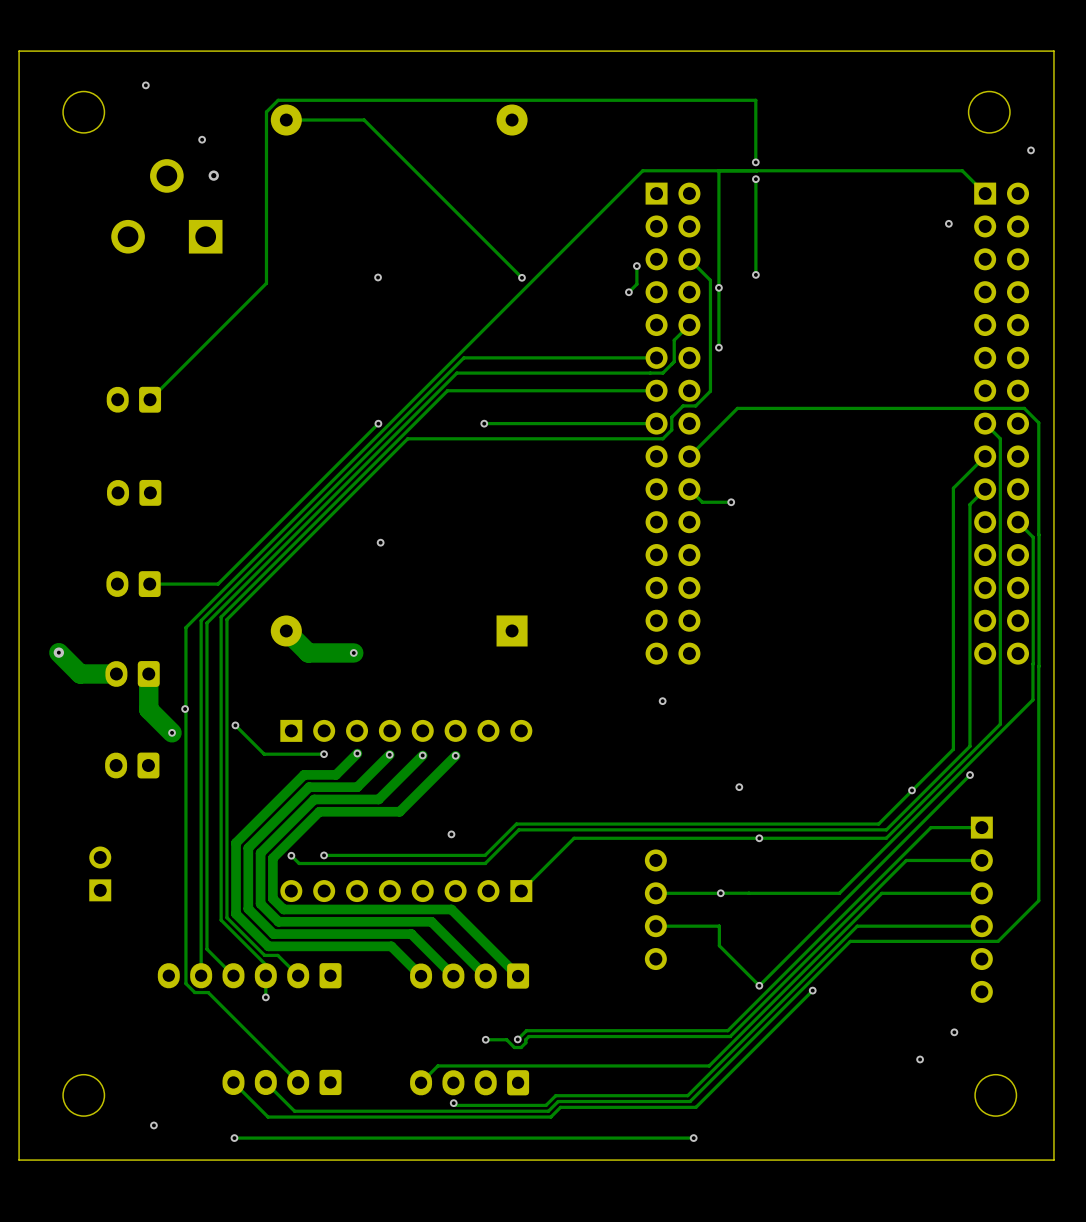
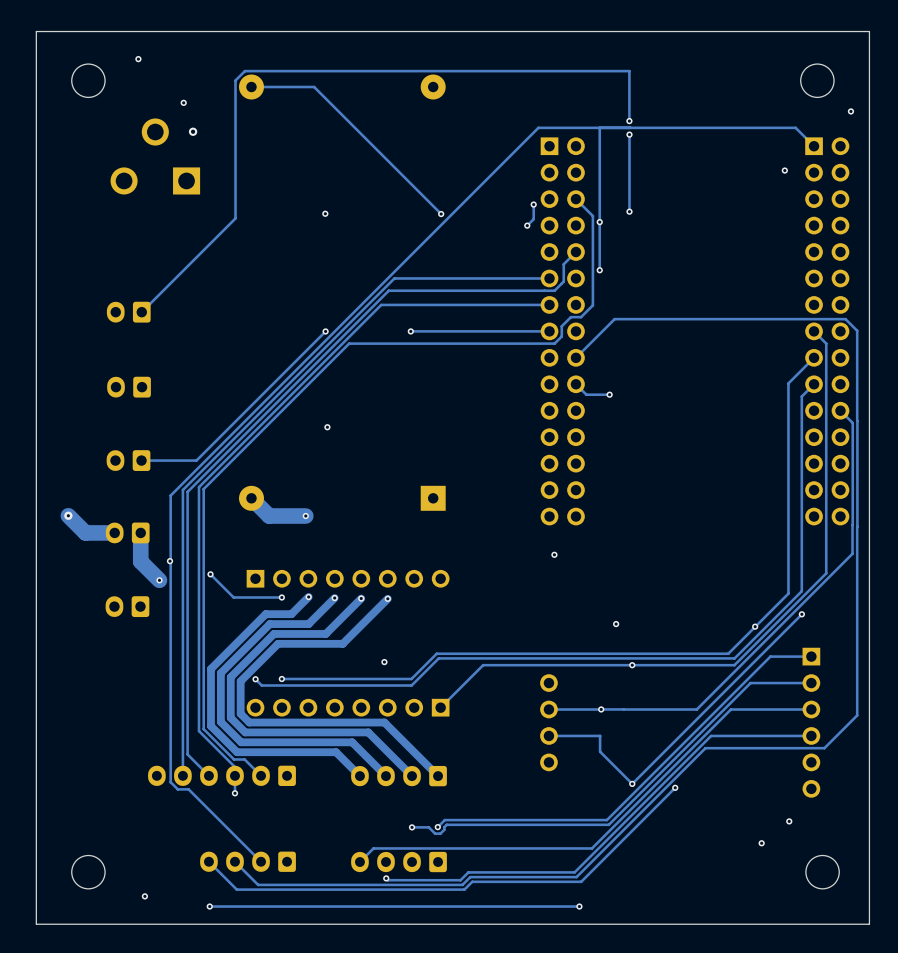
part: (100, 873) -> none

